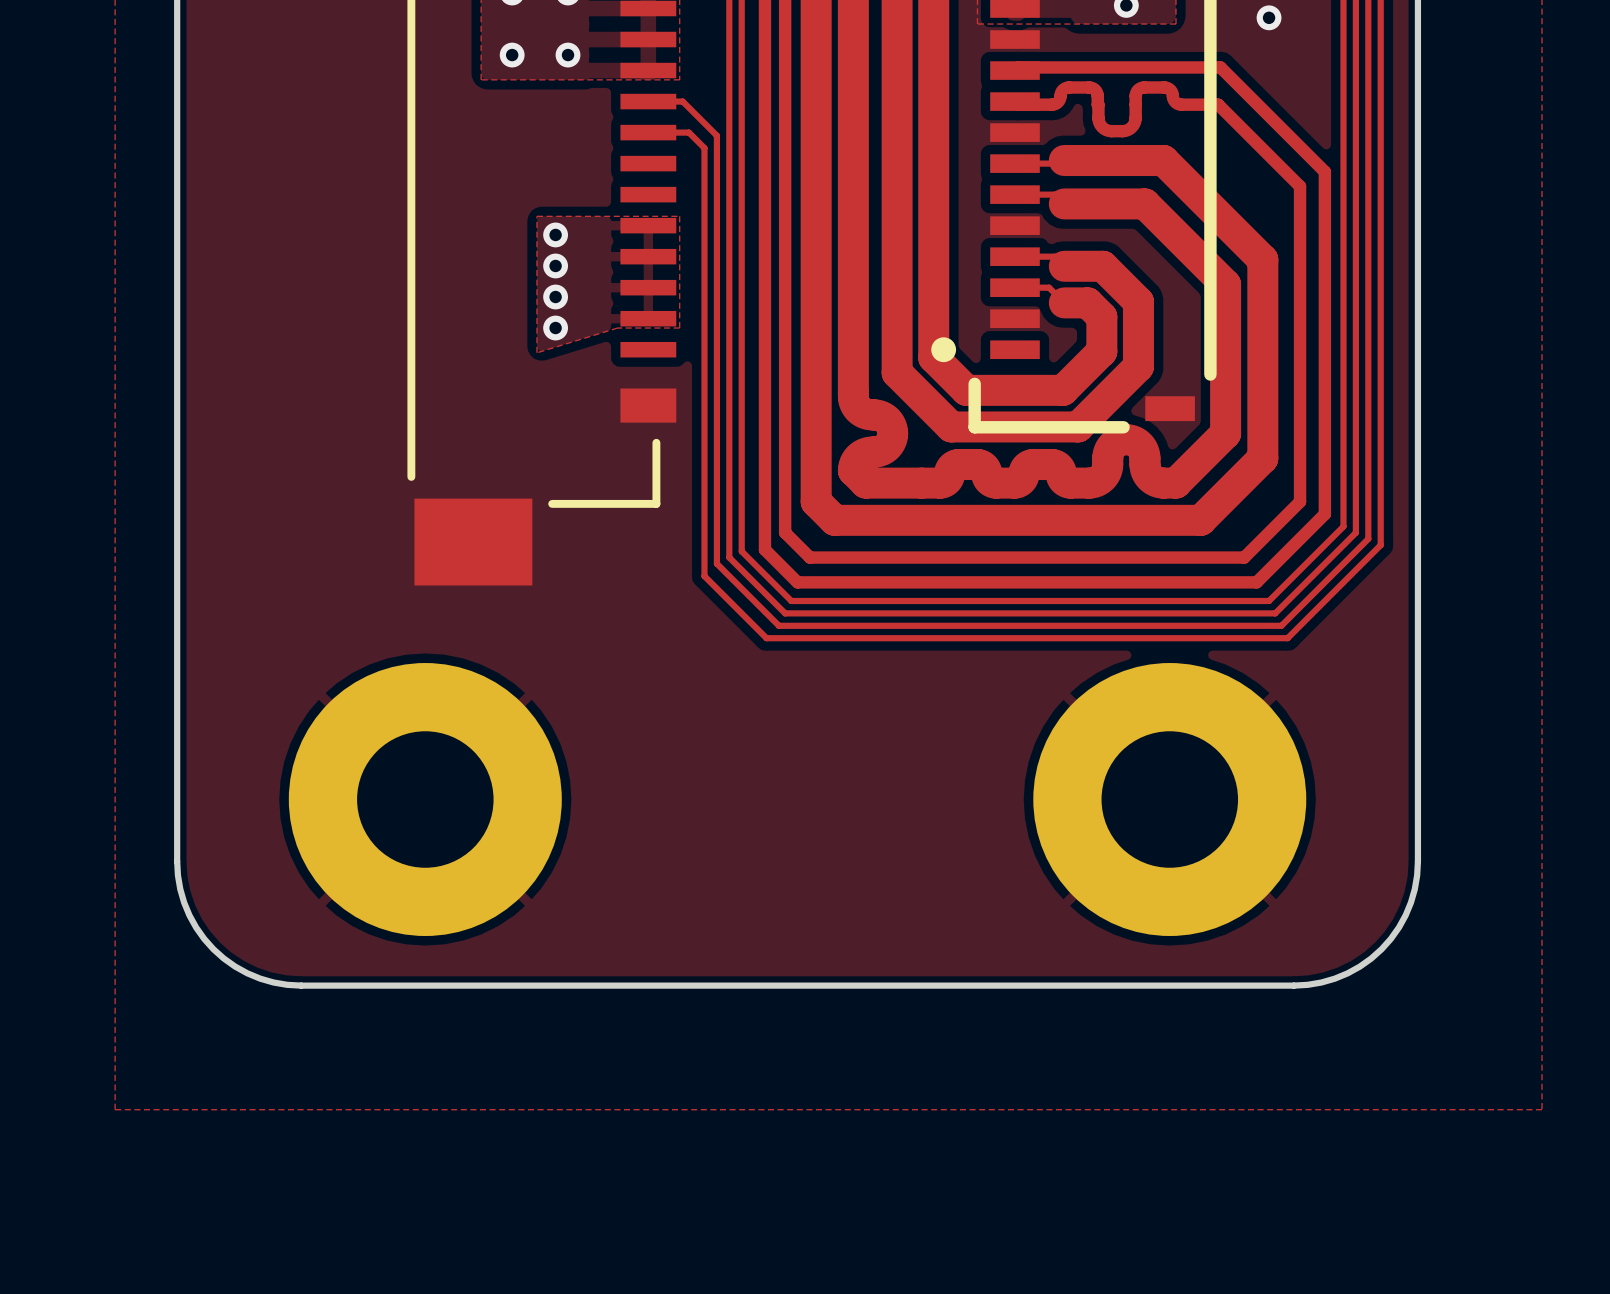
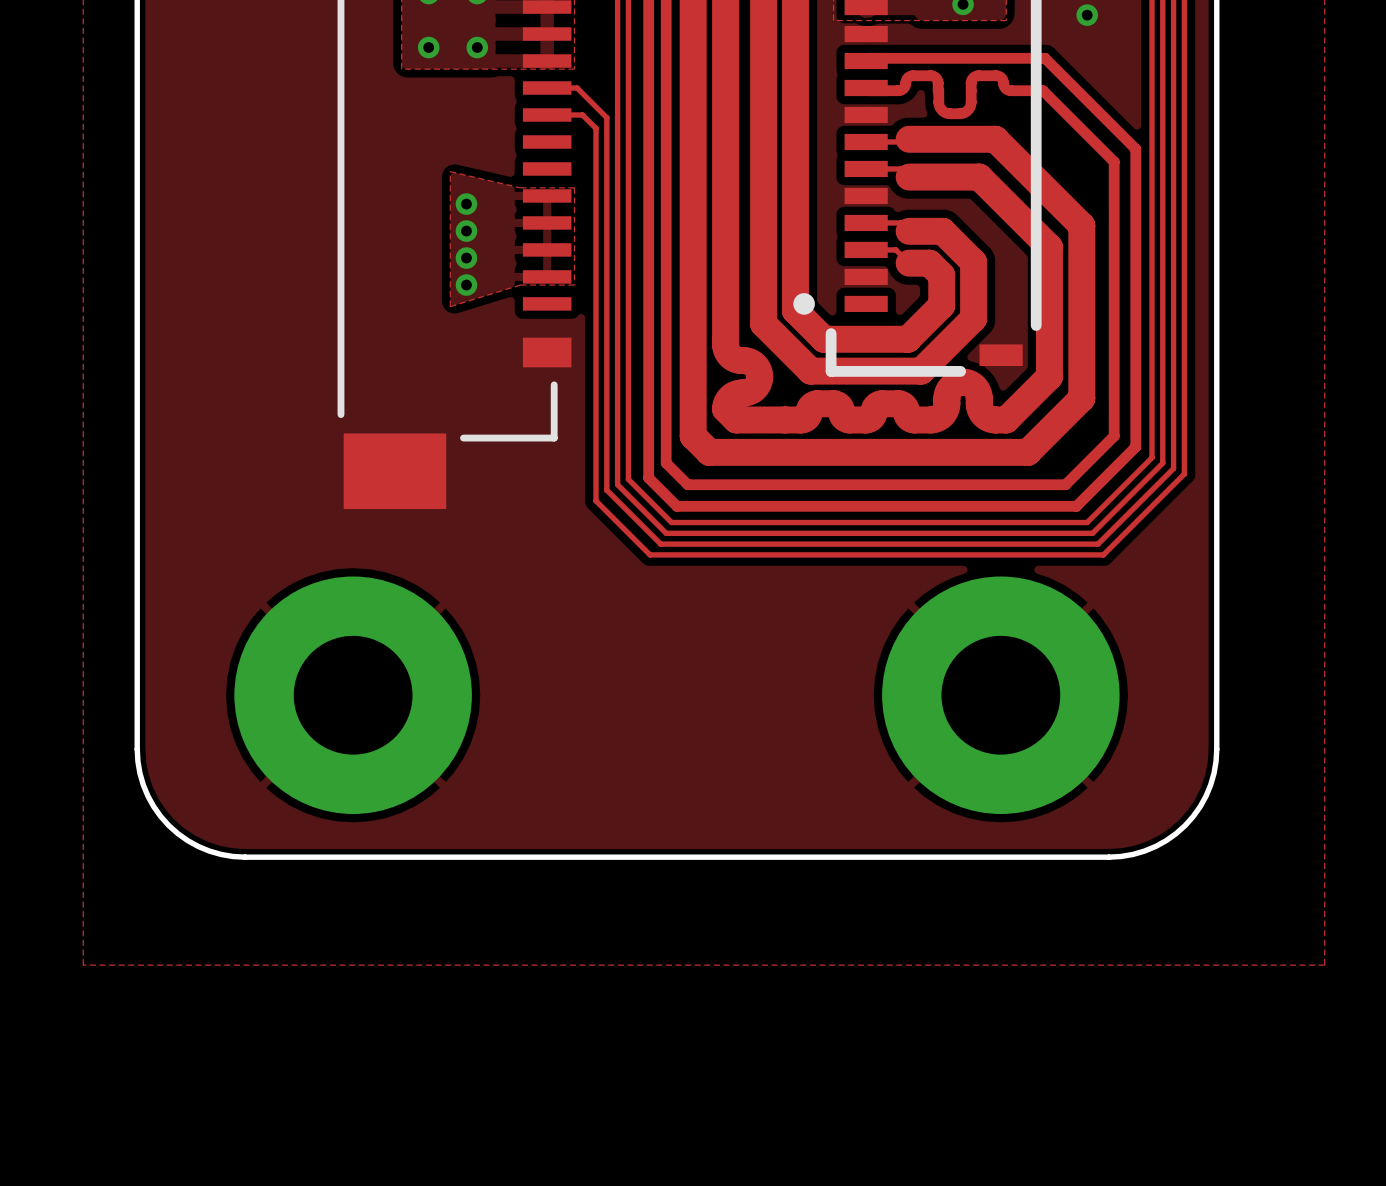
zone outline: (536, 216) (617, 216) -> (450, 187) (450, 171) (520, 187)

